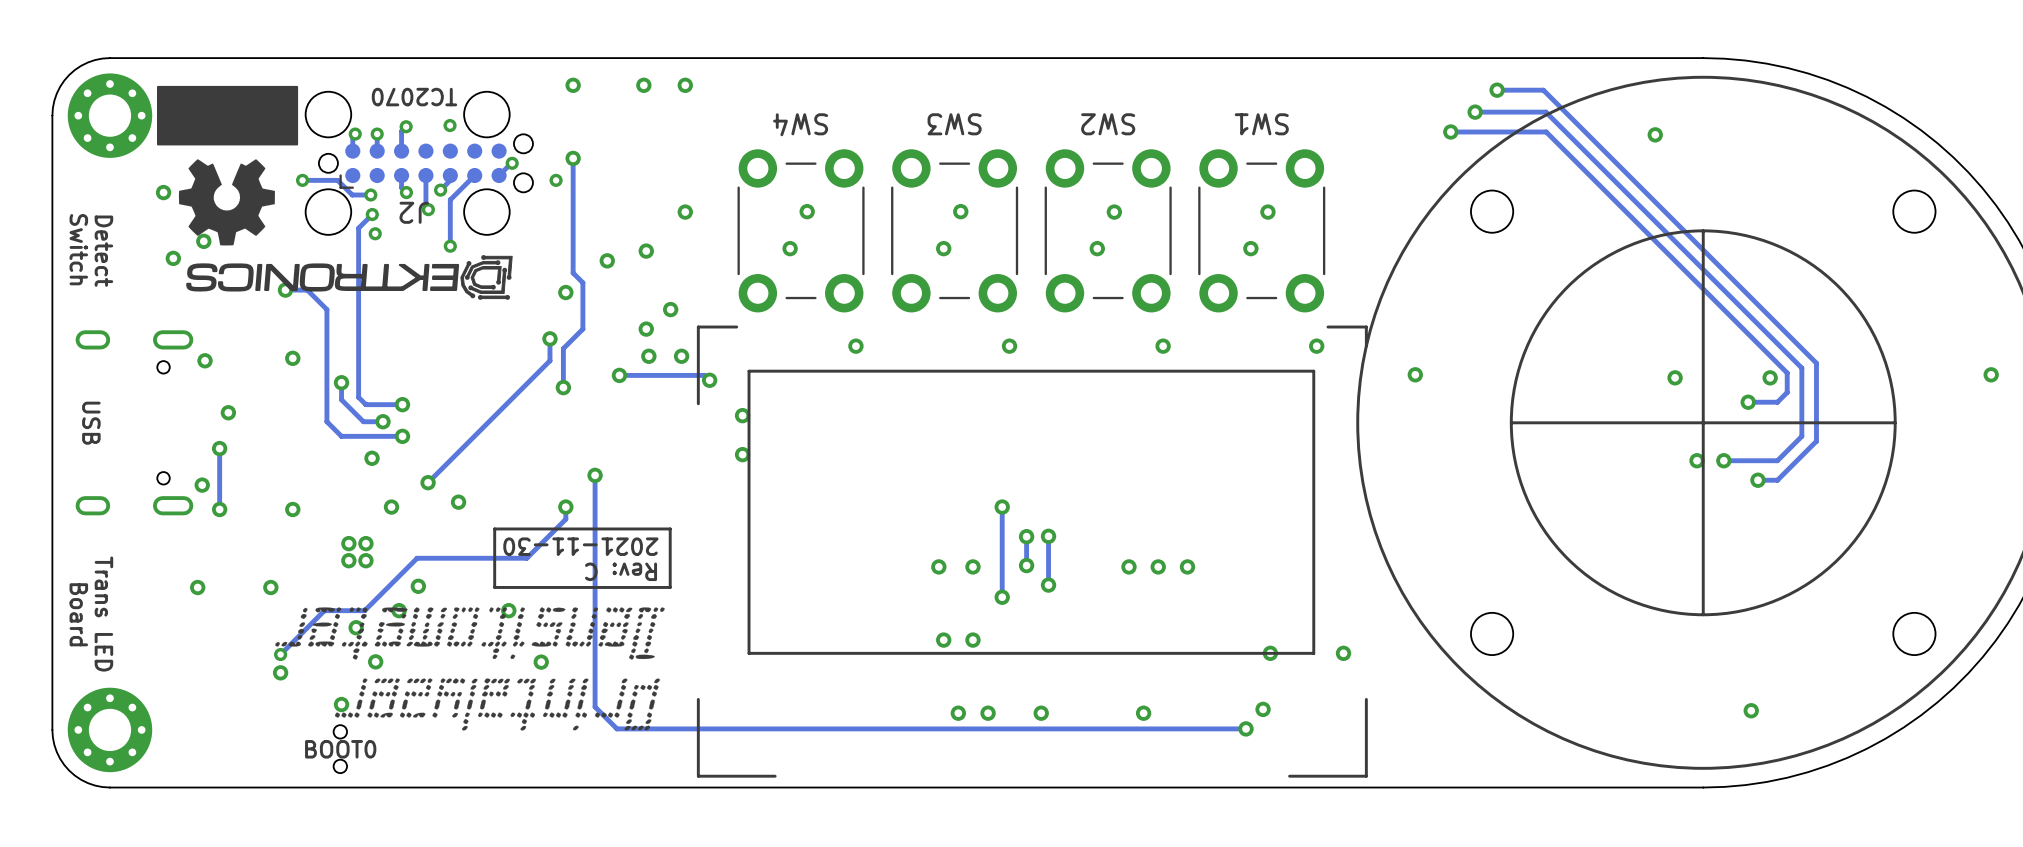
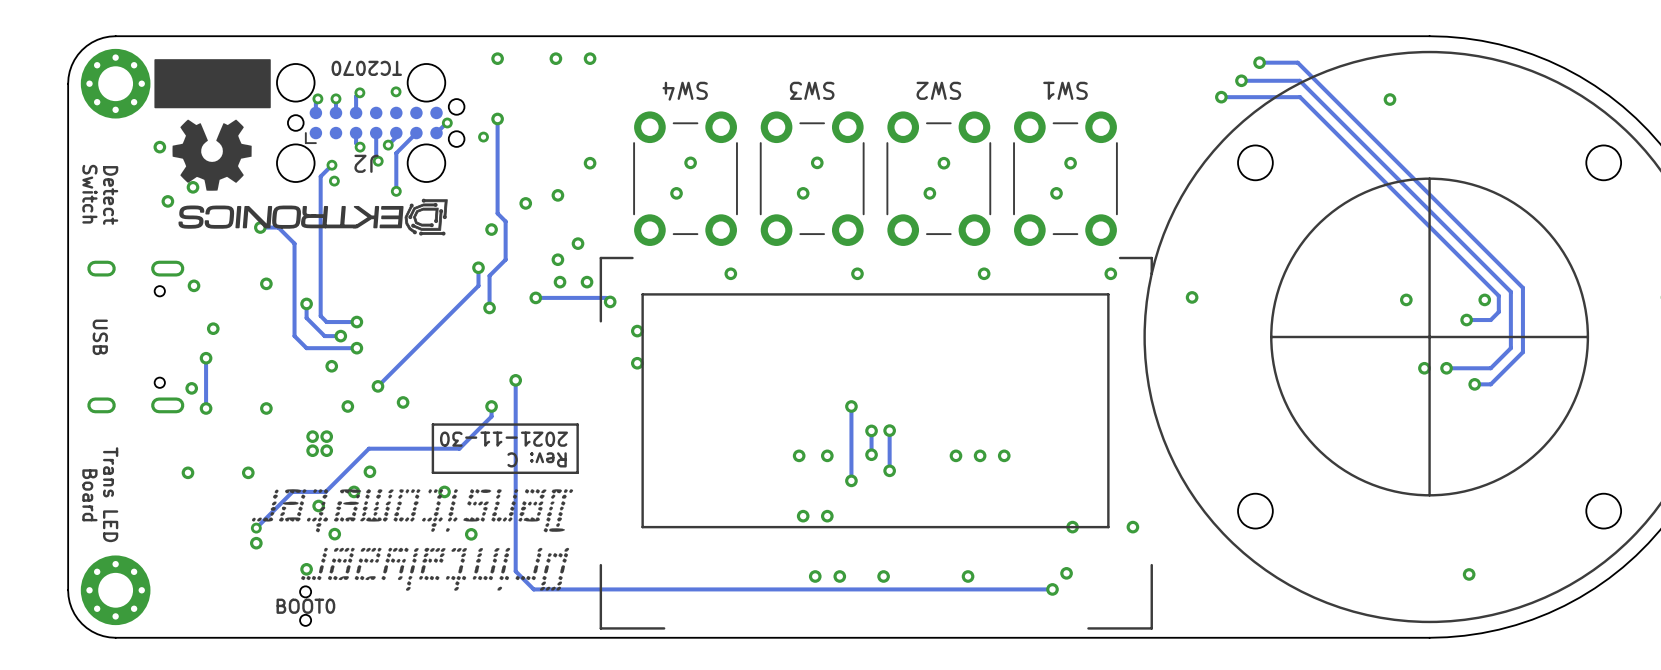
track: (302, 180) (337, 180) (352, 195) (370, 195) -> none
via: (302, 180) -> none
via: (370, 195) -> none

